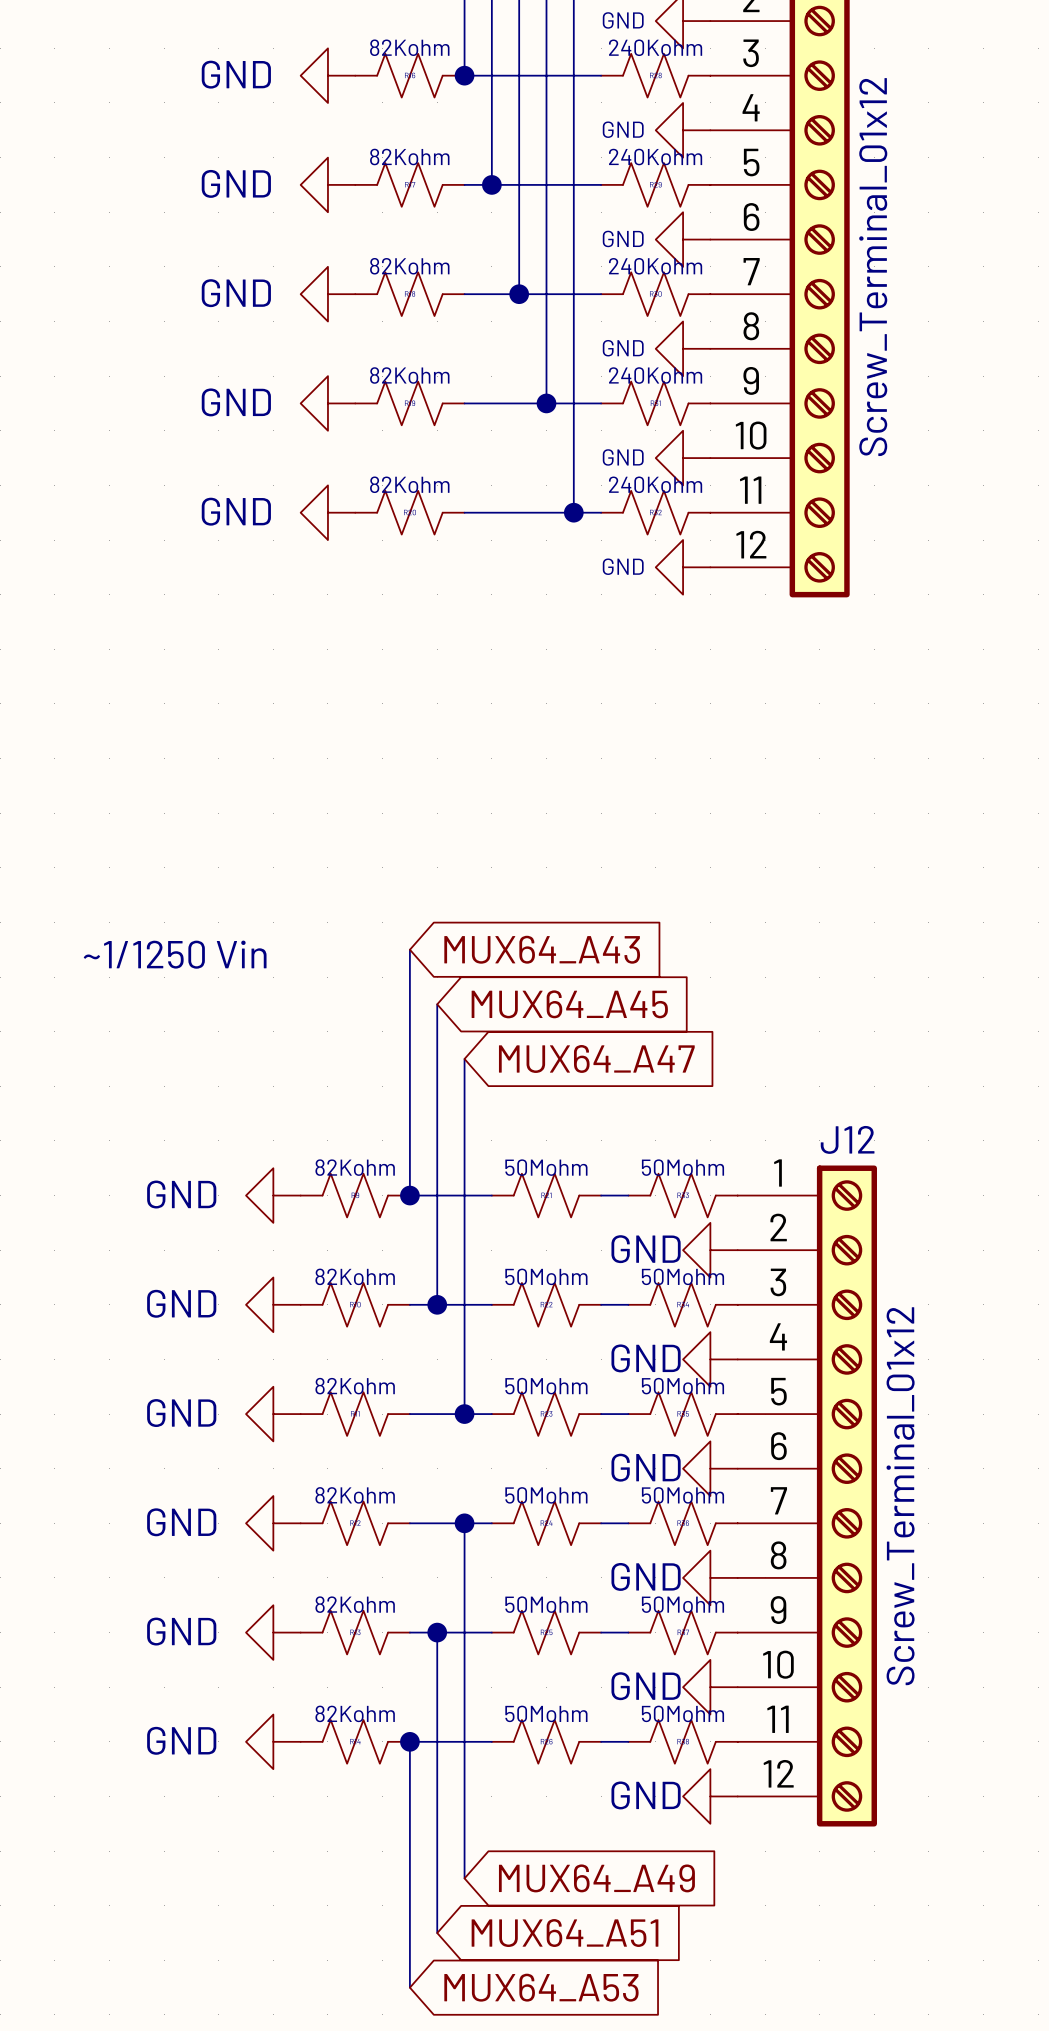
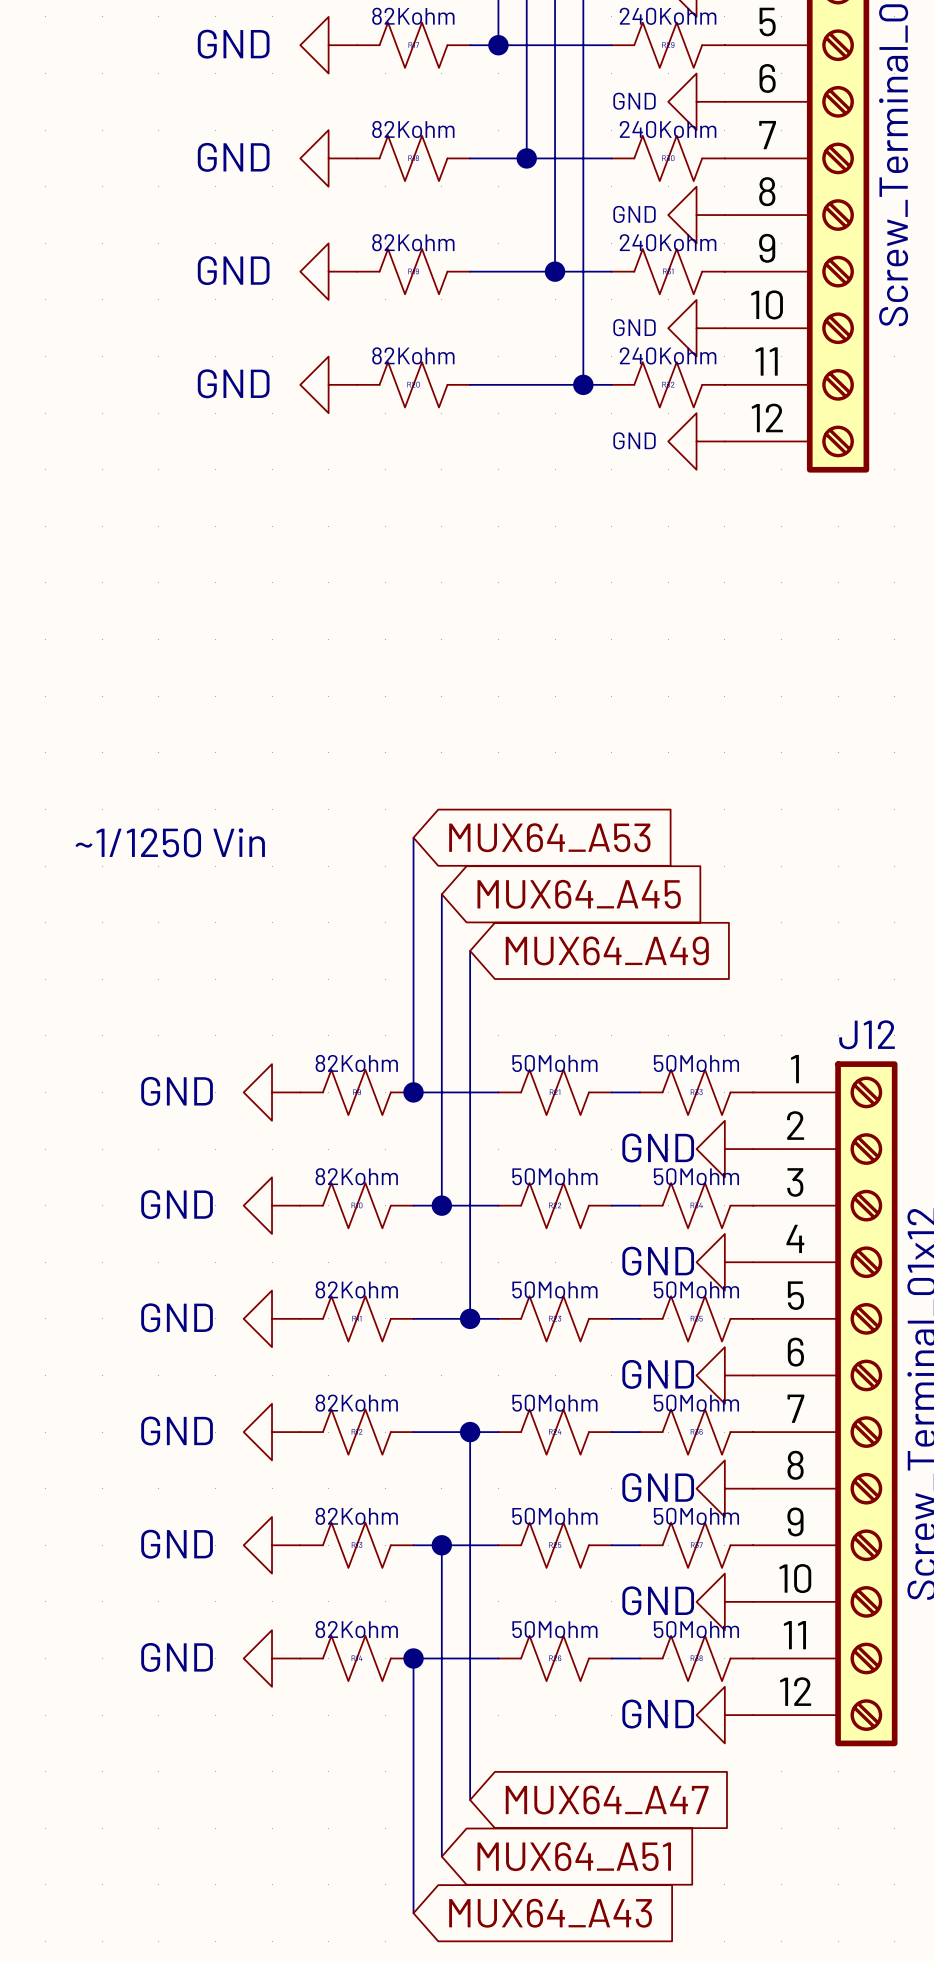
global label: MUX64_A43 (542, 949) -> MUX64_A53 (549, 837)
global label: MUX64_A47 (596, 1058) -> MUX64_A49 (607, 950)
global label: MUX64_A49 (596, 1878) -> MUX64_A47 (607, 1800)
global label: MUX64_A53 (541, 1987) -> MUX64_A43 (550, 1913)

